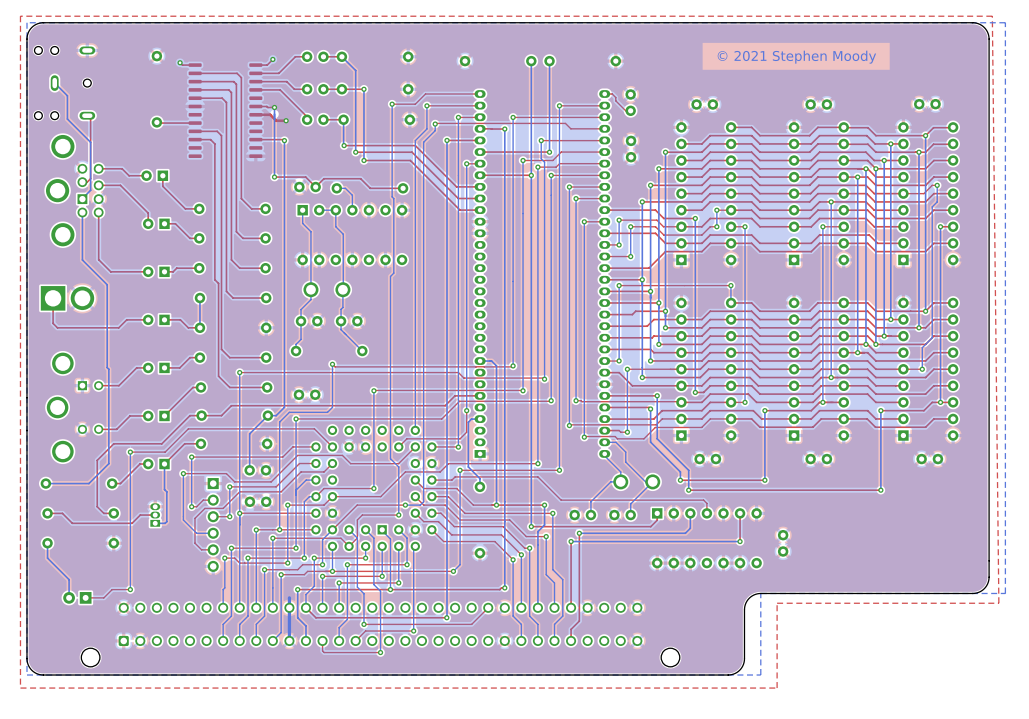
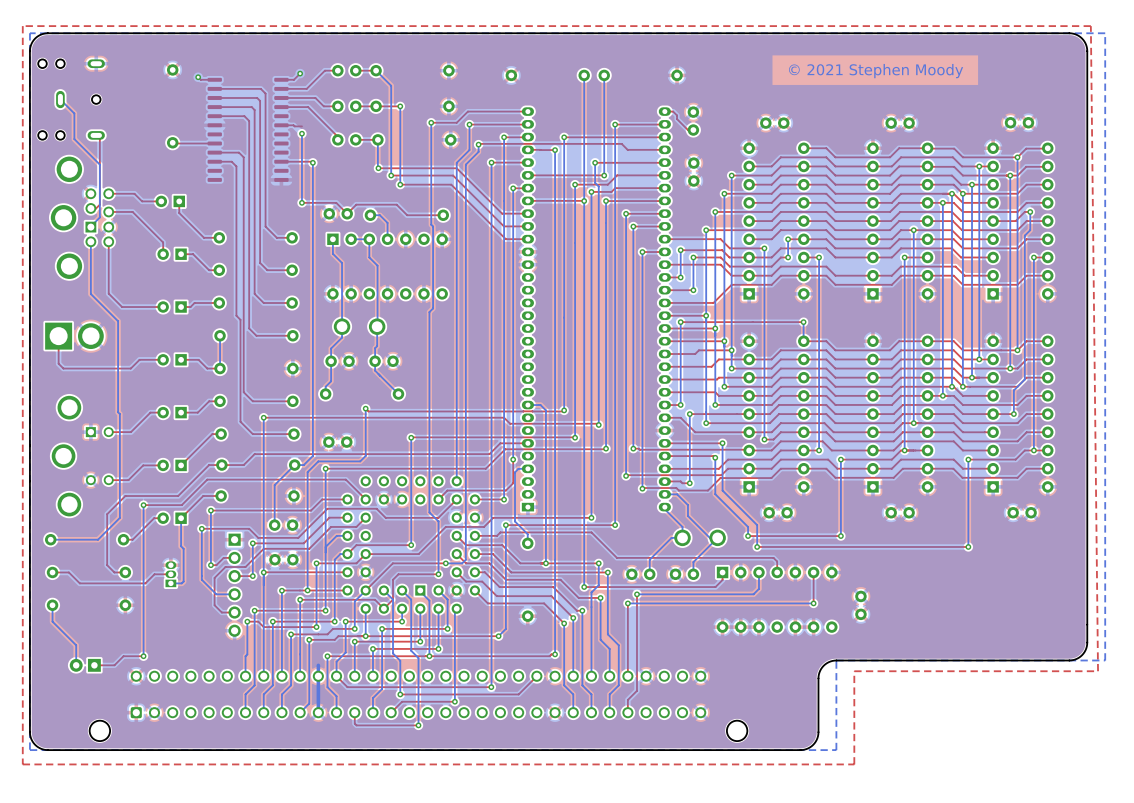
bottom track: (274, 107) (274, 114) -> none
via: (274, 107) -> none
top track: (255, 114) (270, 114) (276, 120) (286, 120) -> none
via: none -> (301, 133)
via: (286, 120) -> none

